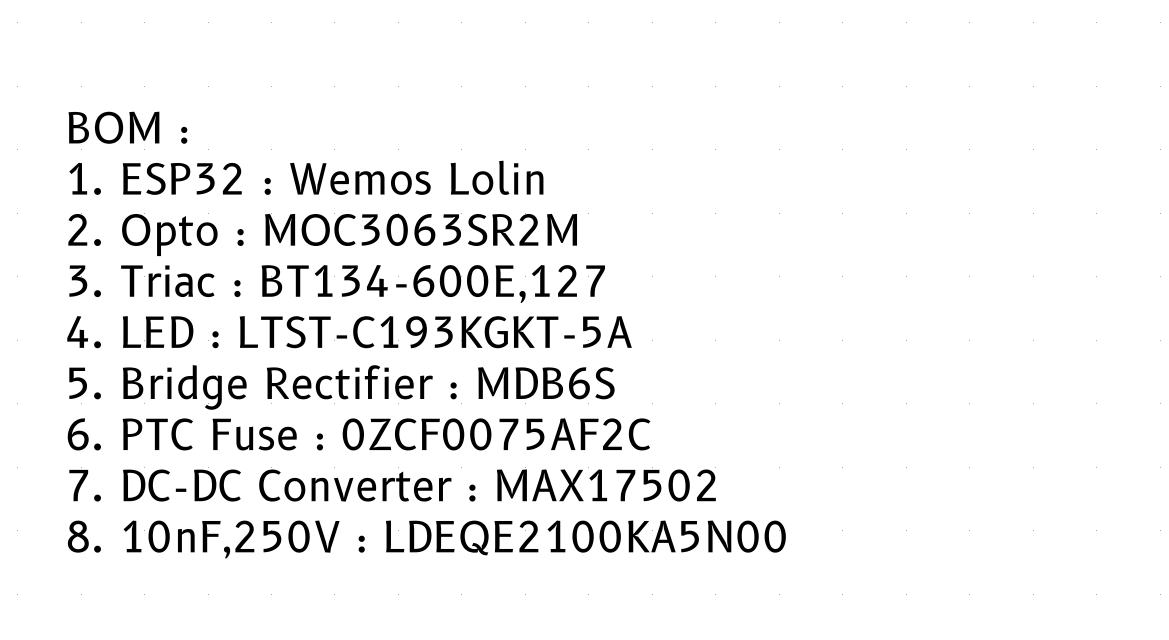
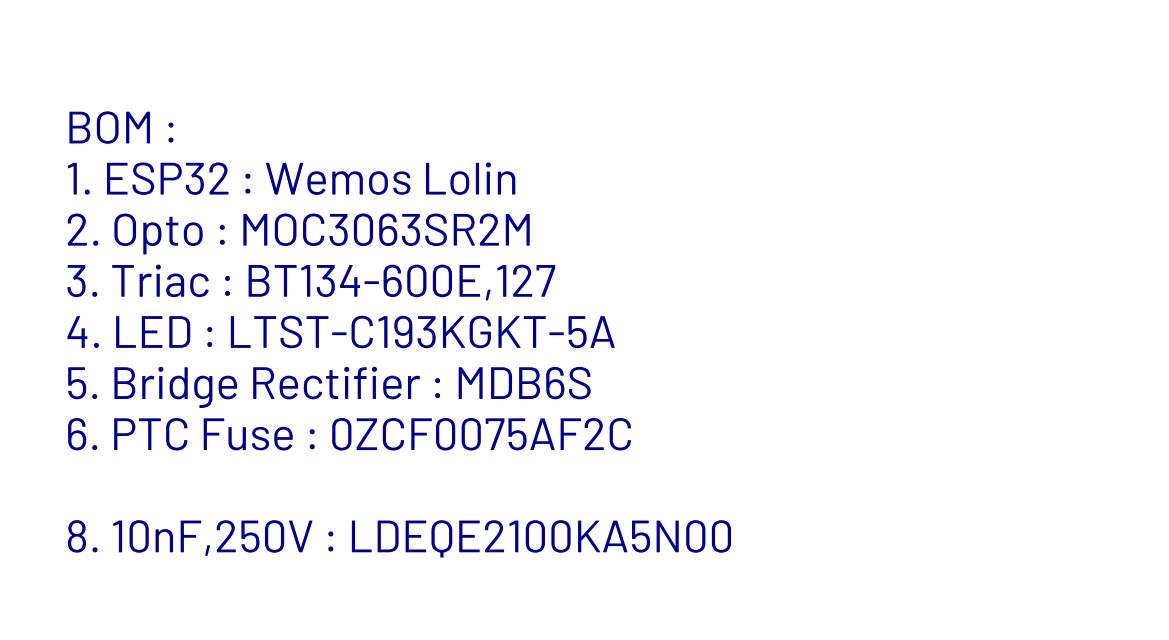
text: 7. DC-DC Converter : MAX17502 (392, 485) -> none

